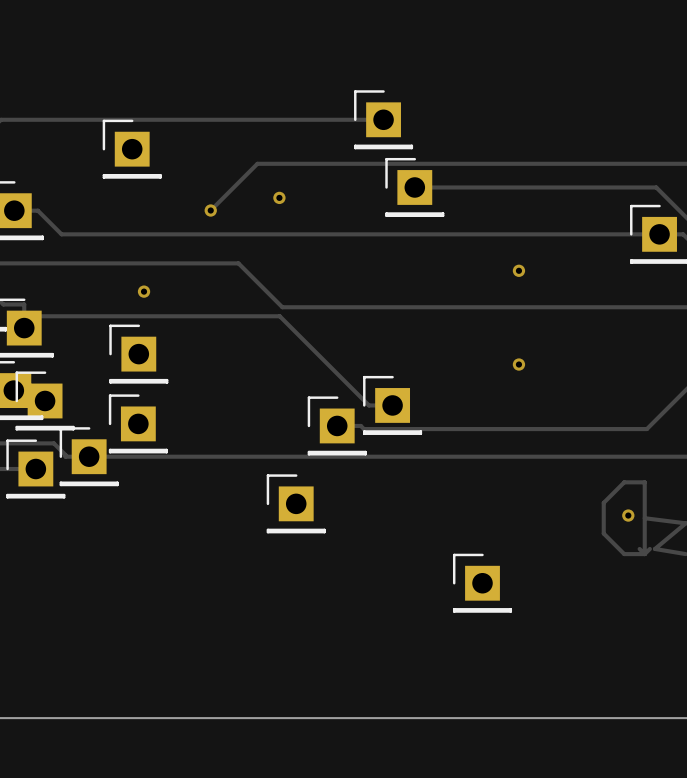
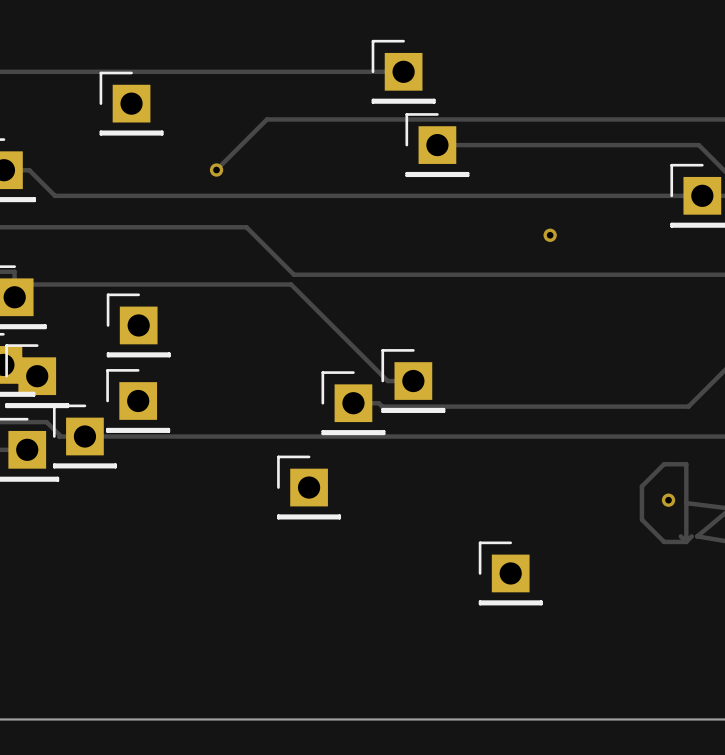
via: (279, 197) -> none
via: (144, 291) -> none
via: (518, 364) -> none

